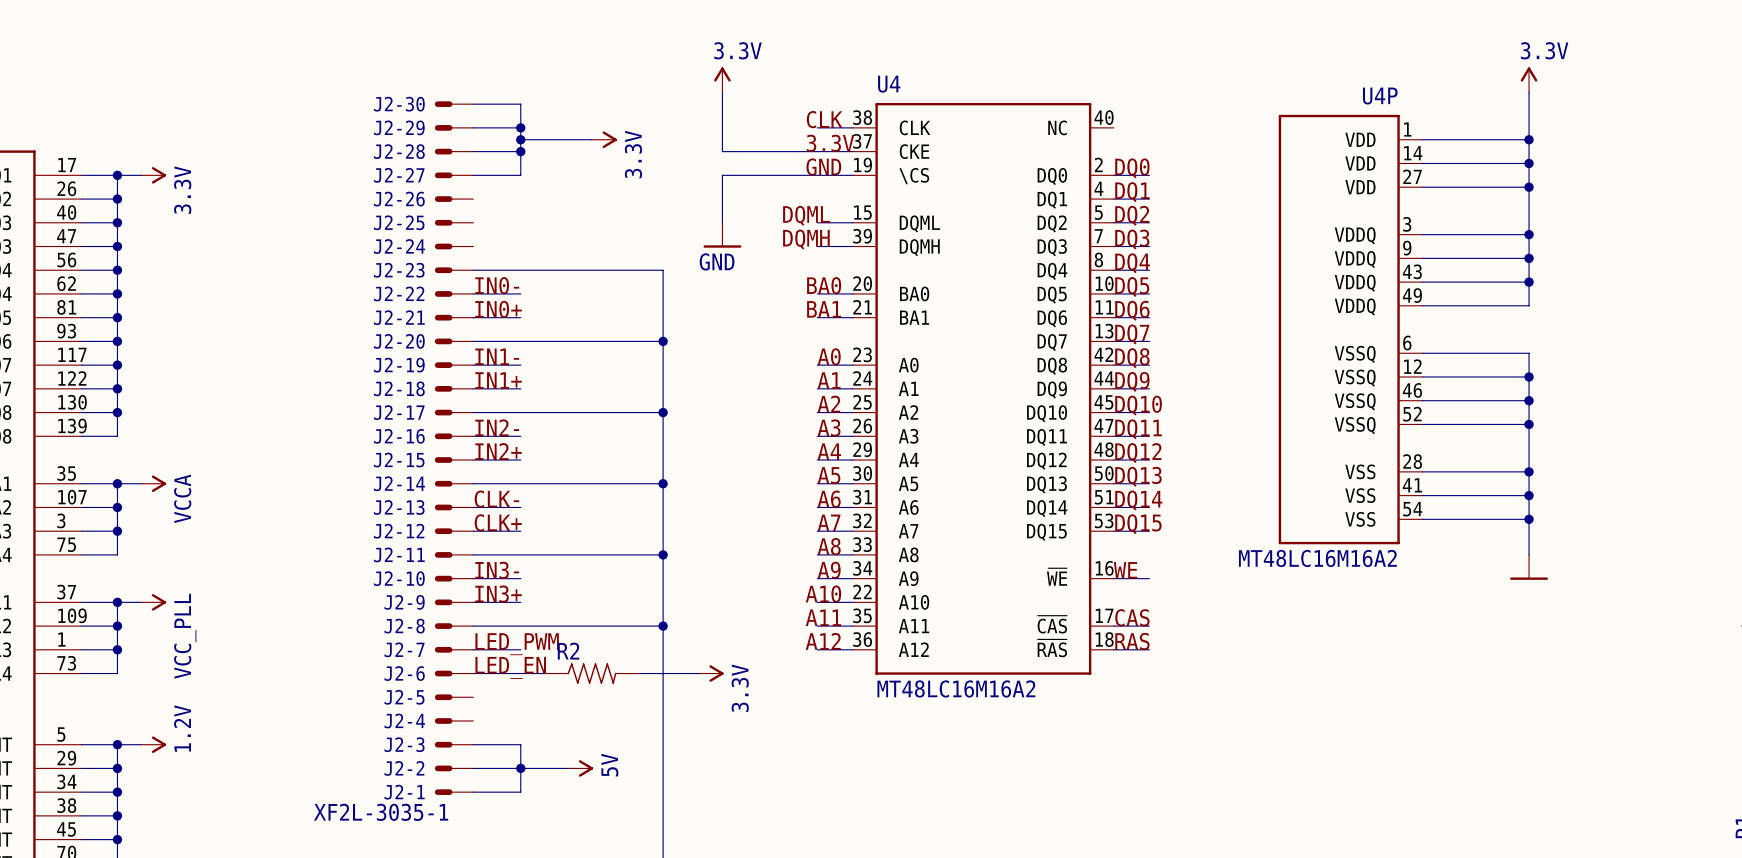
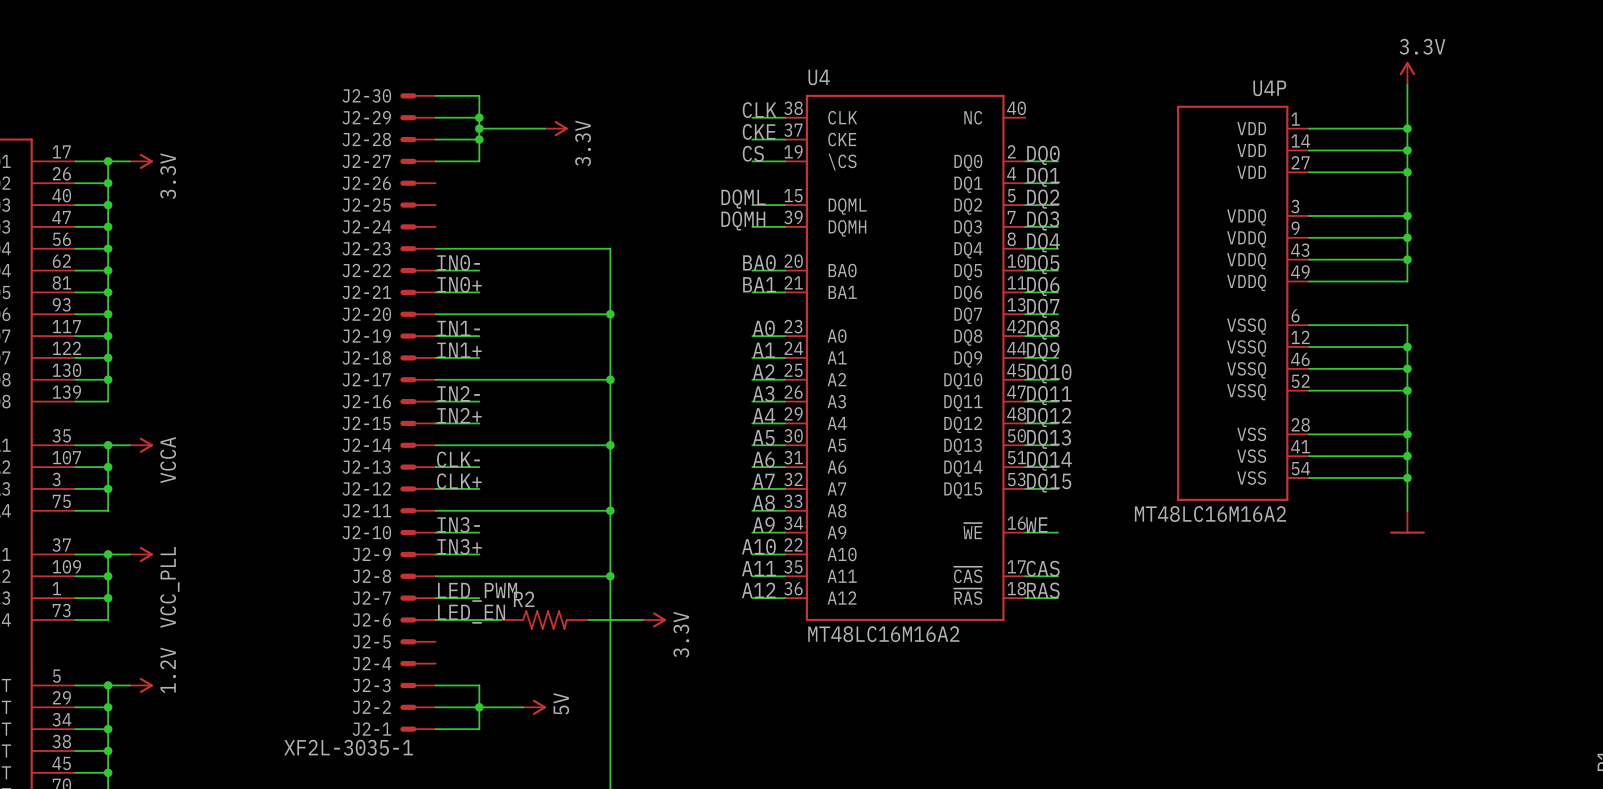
power symbol: 3.3V (722, 79) -> none
wire: (722, 92) (722, 151) (817, 151) -> none
label: 3.3V (830, 143) -> CKE (759, 131)
label: GND (823, 167) -> CS (753, 153)
wire: (817, 175) (722, 175) (722, 222) -> none
power symbol: GND (722, 235) -> none

